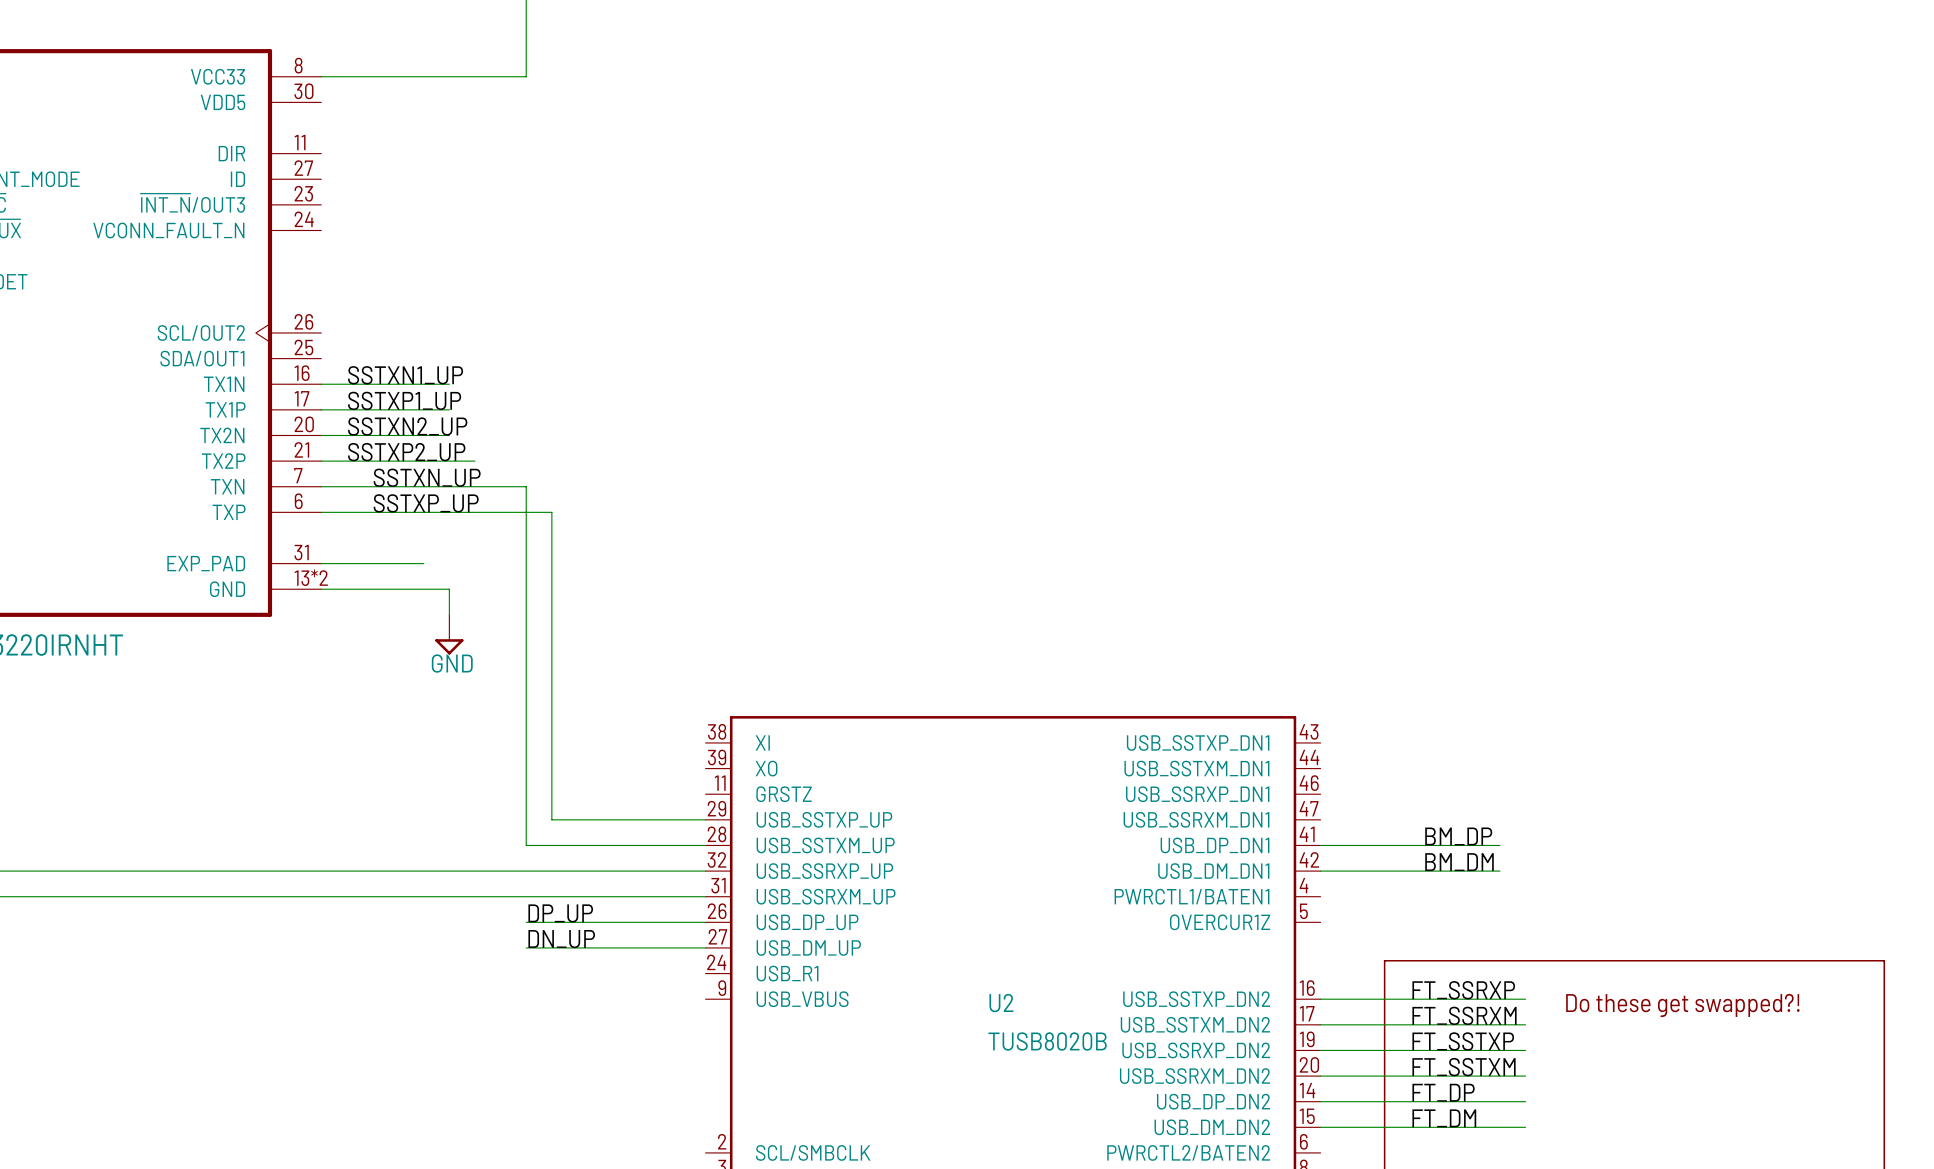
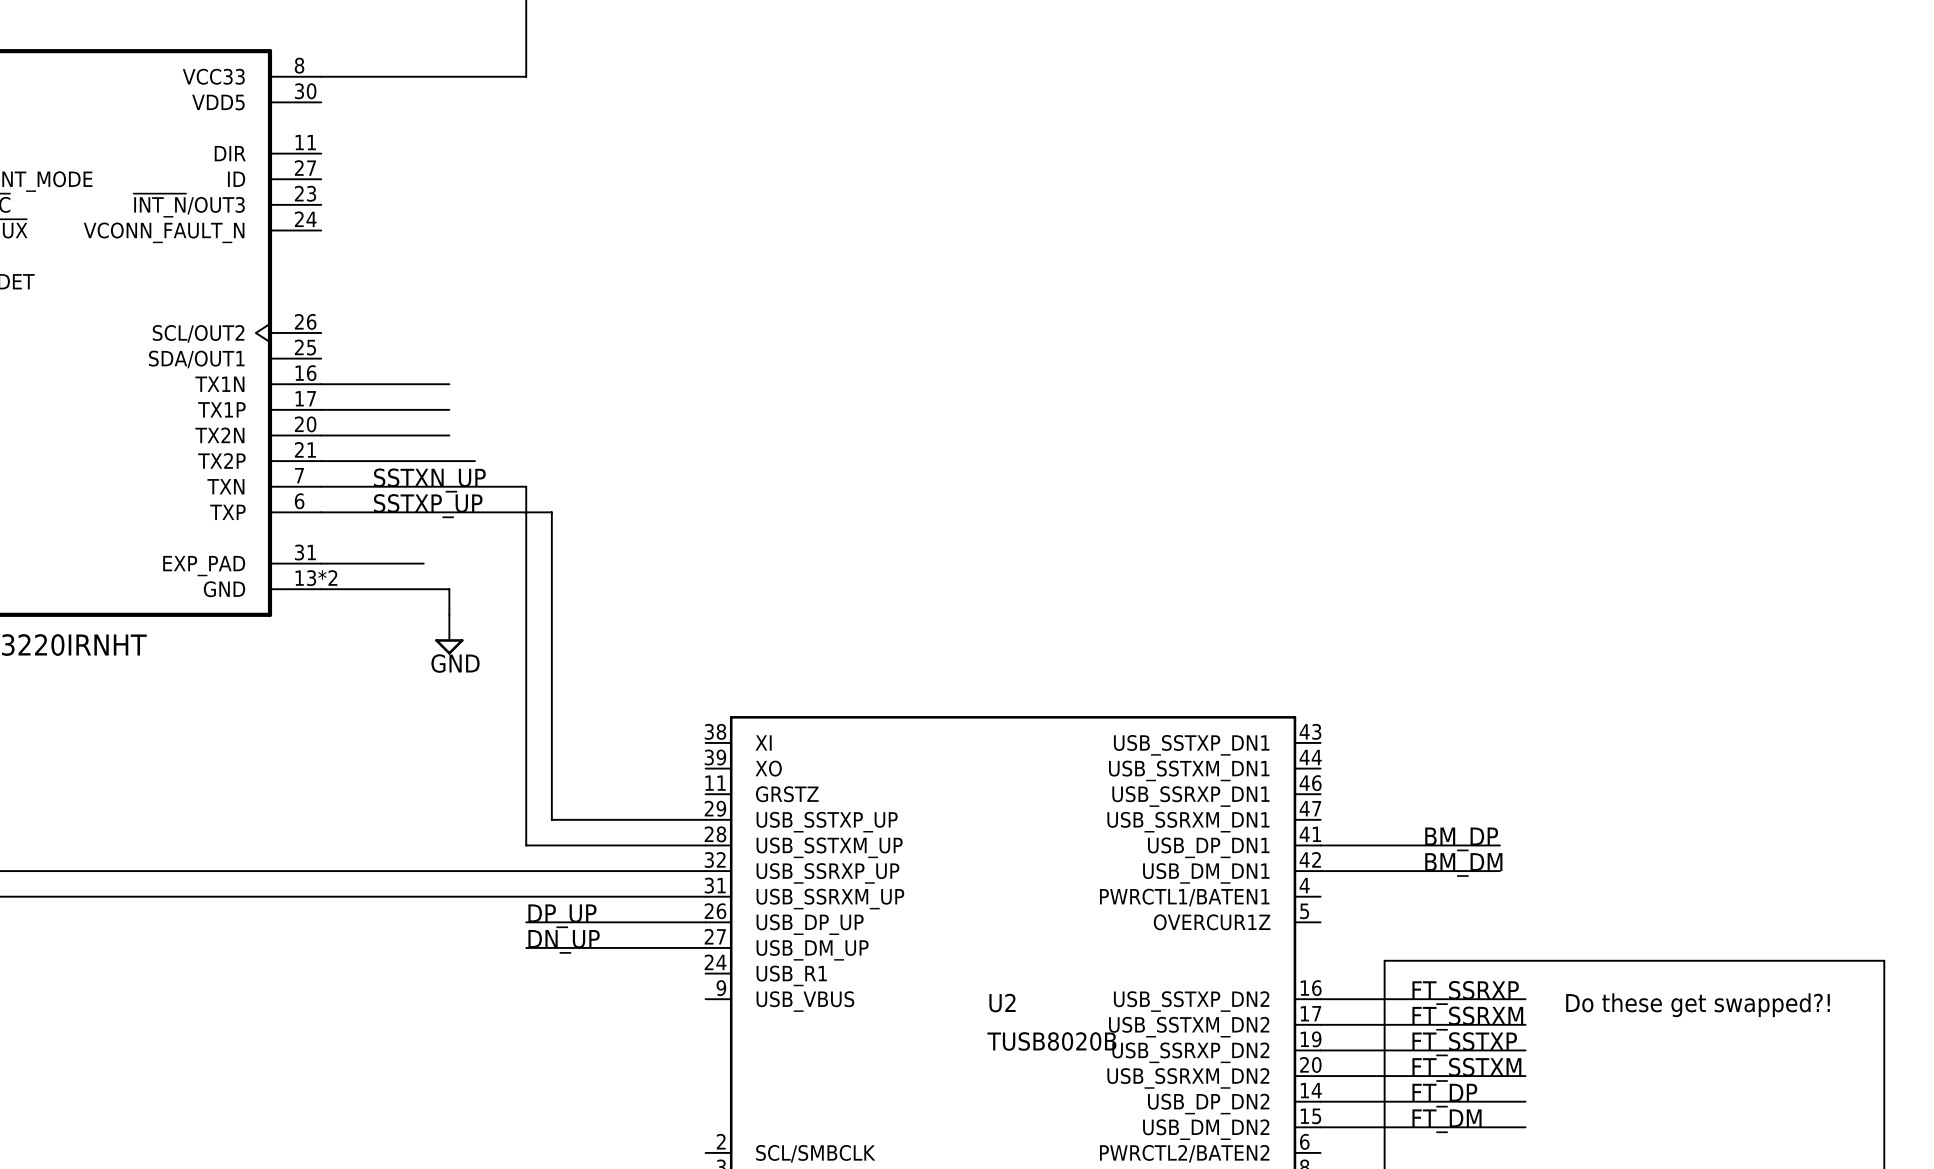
label: SSTXN1_UP (405, 375) -> none
label: SSTXP1_UP (404, 400) -> none
label: SSTXN2_UP (407, 426) -> none
label: SSTXP2_UP (406, 452) -> none

